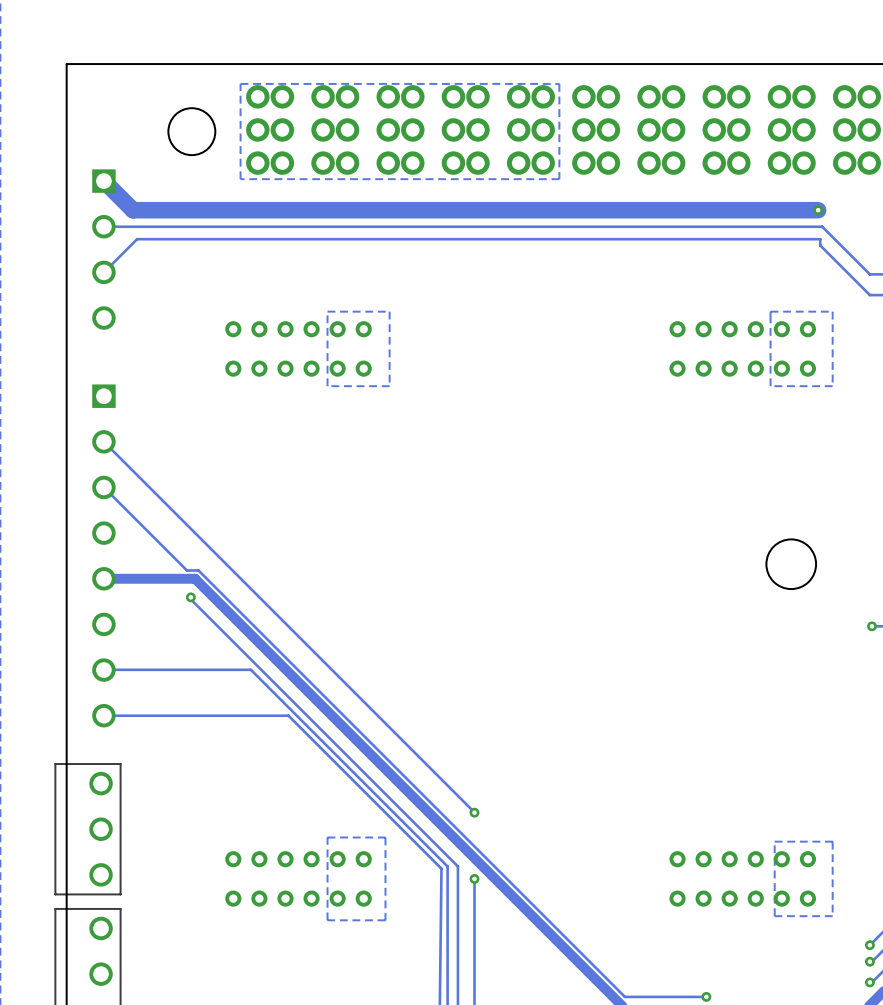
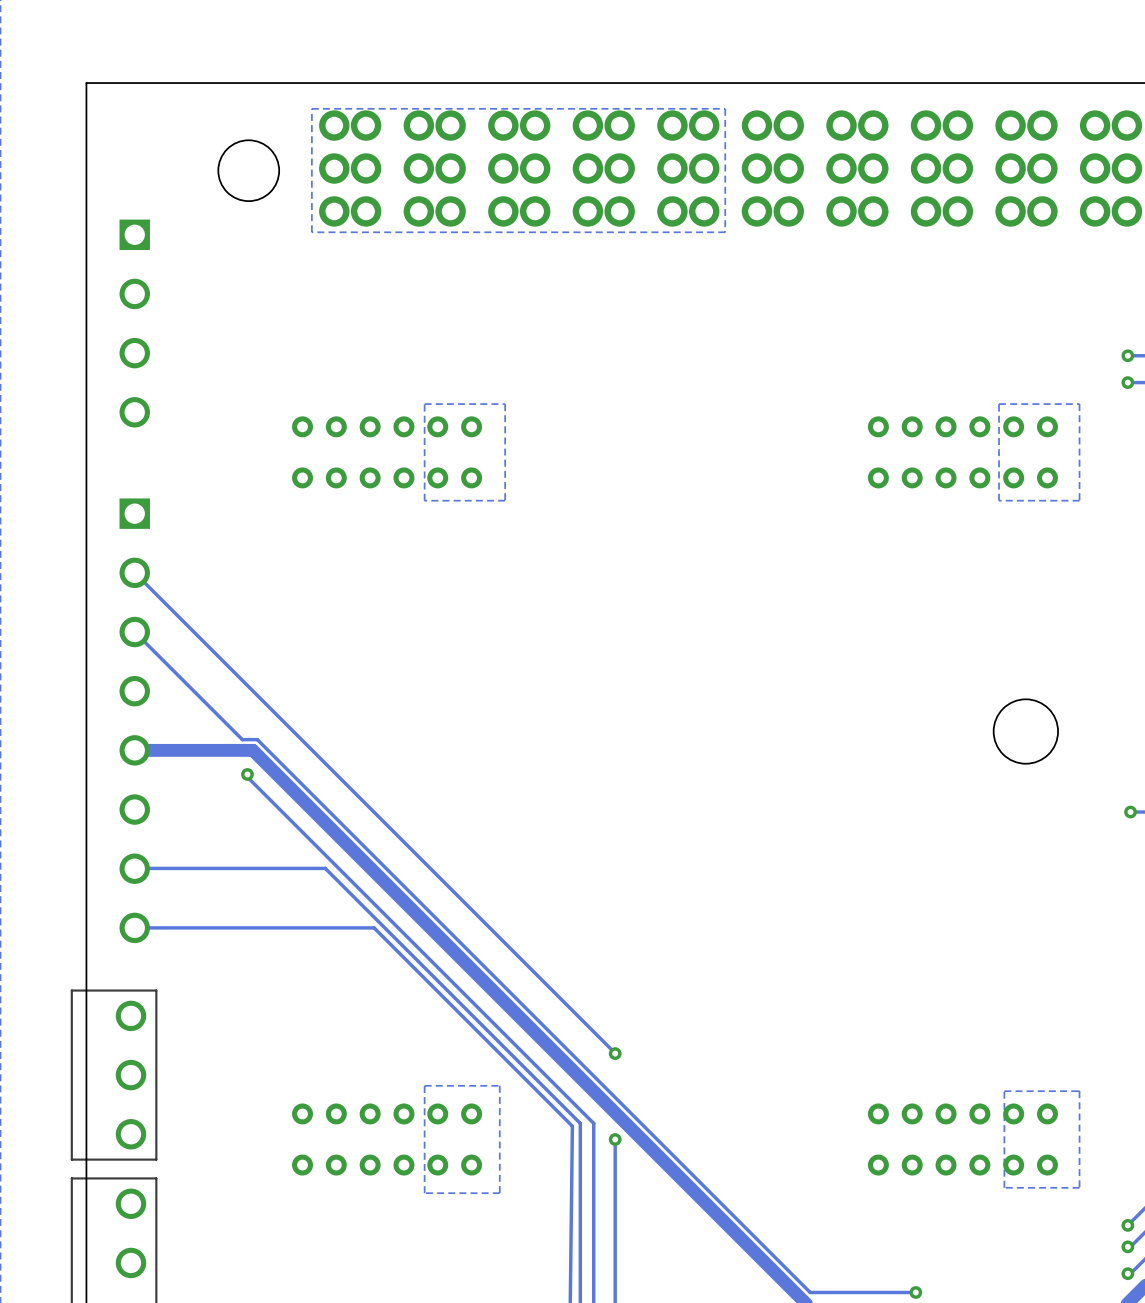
track: (103, 181) (133, 210) (818, 210) -> none
via: (818, 210) -> none
track: (103, 226) (822, 226) (869, 274) -> none
track: (103, 272) (137, 239) (820, 239) (820, 245) (869, 295) -> none
via: none -> (1127, 355)
via: none -> (1127, 382)

